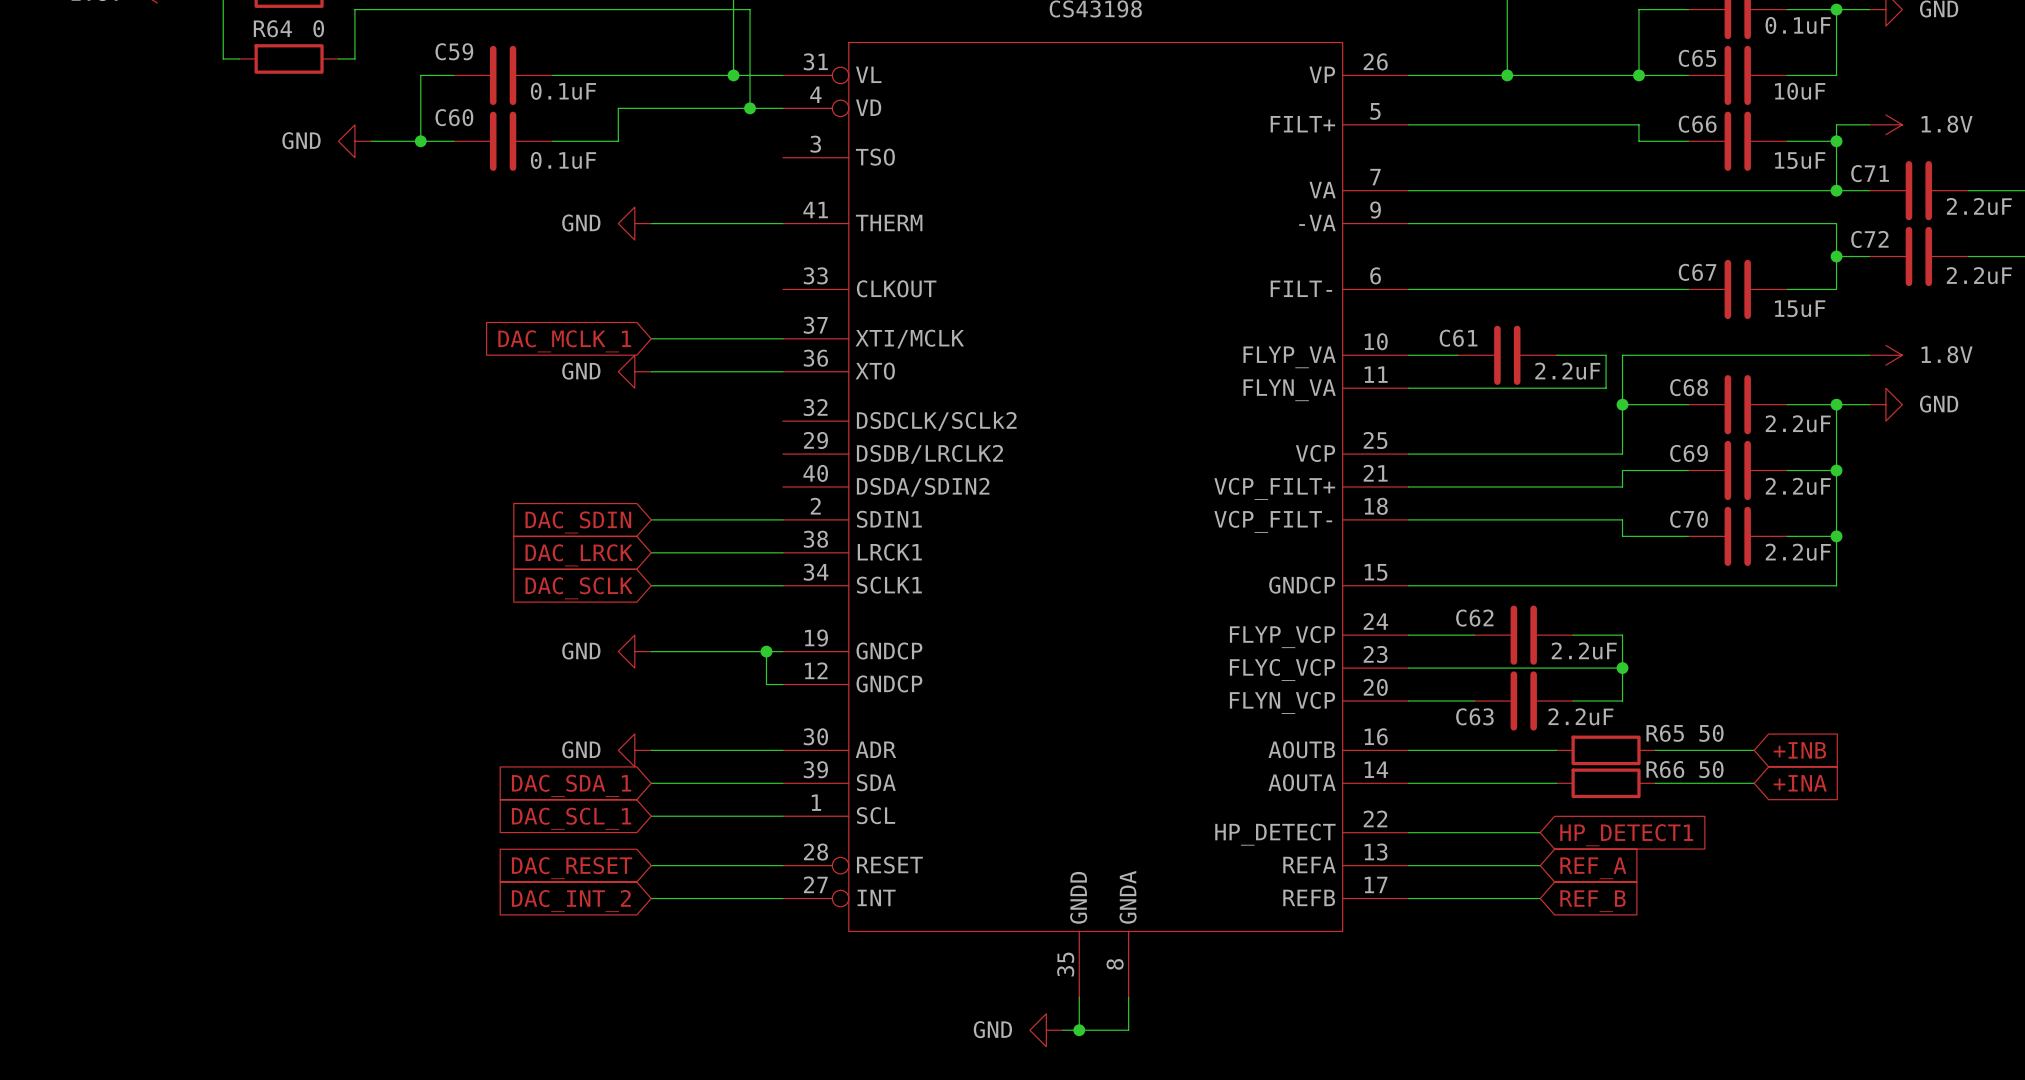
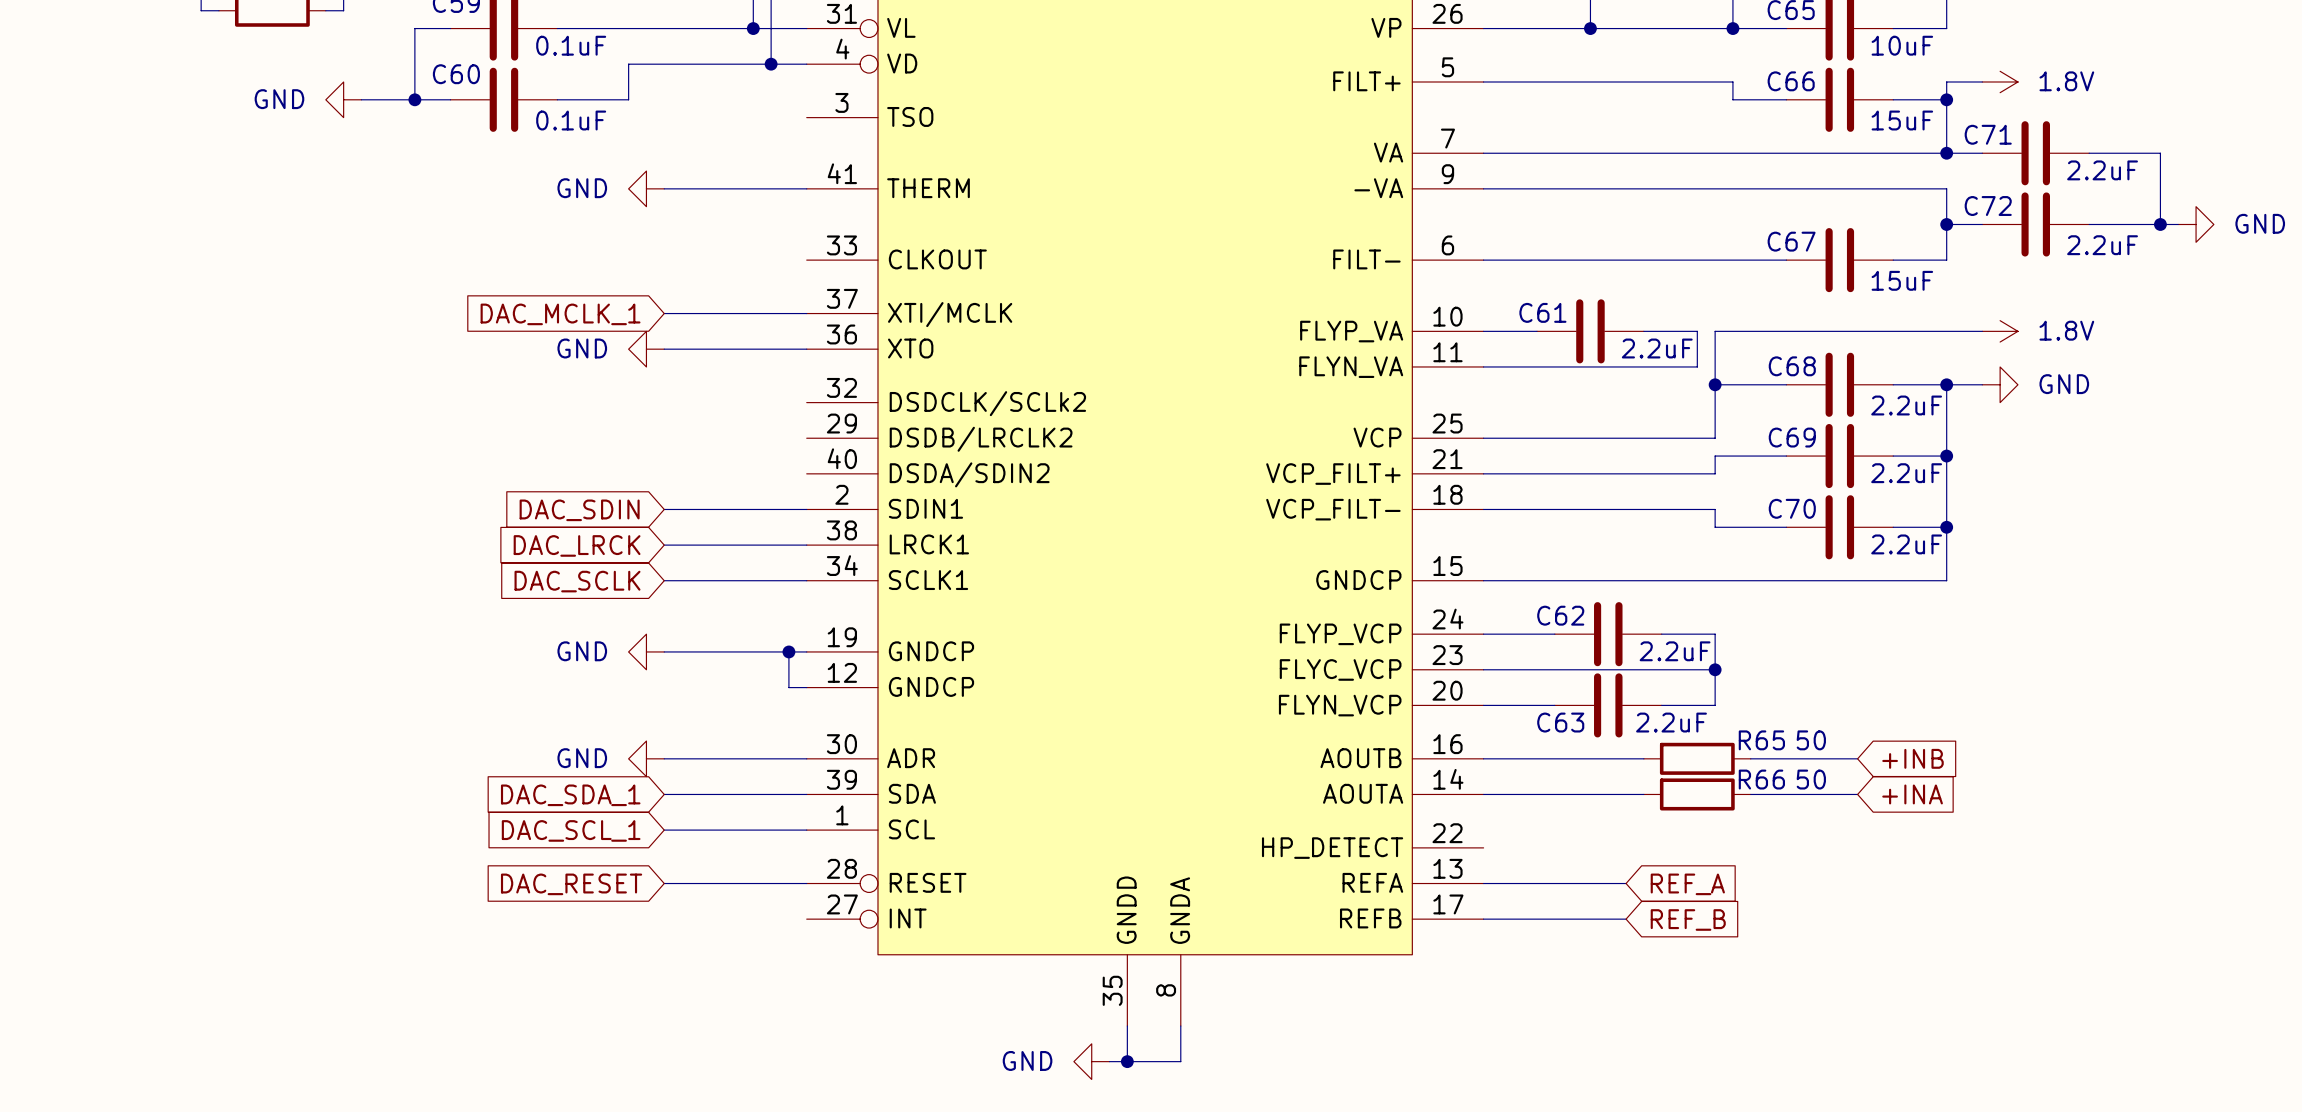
wire: (1408, 832) (1540, 832) -> none
global label: HP_DETECT1 (1626, 835) -> none
wire: (651, 898) (782, 898) -> none
global label: DAC_INT_2 (571, 901) -> none

